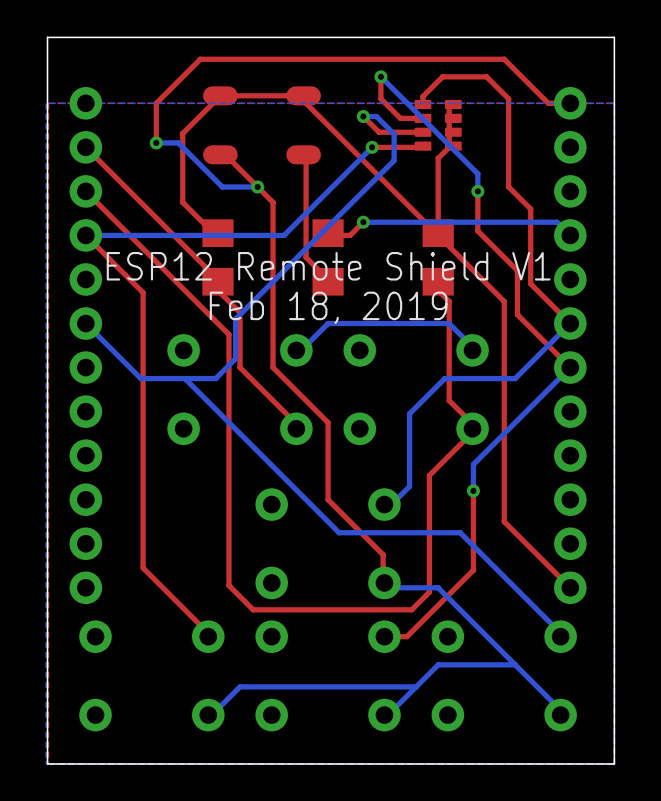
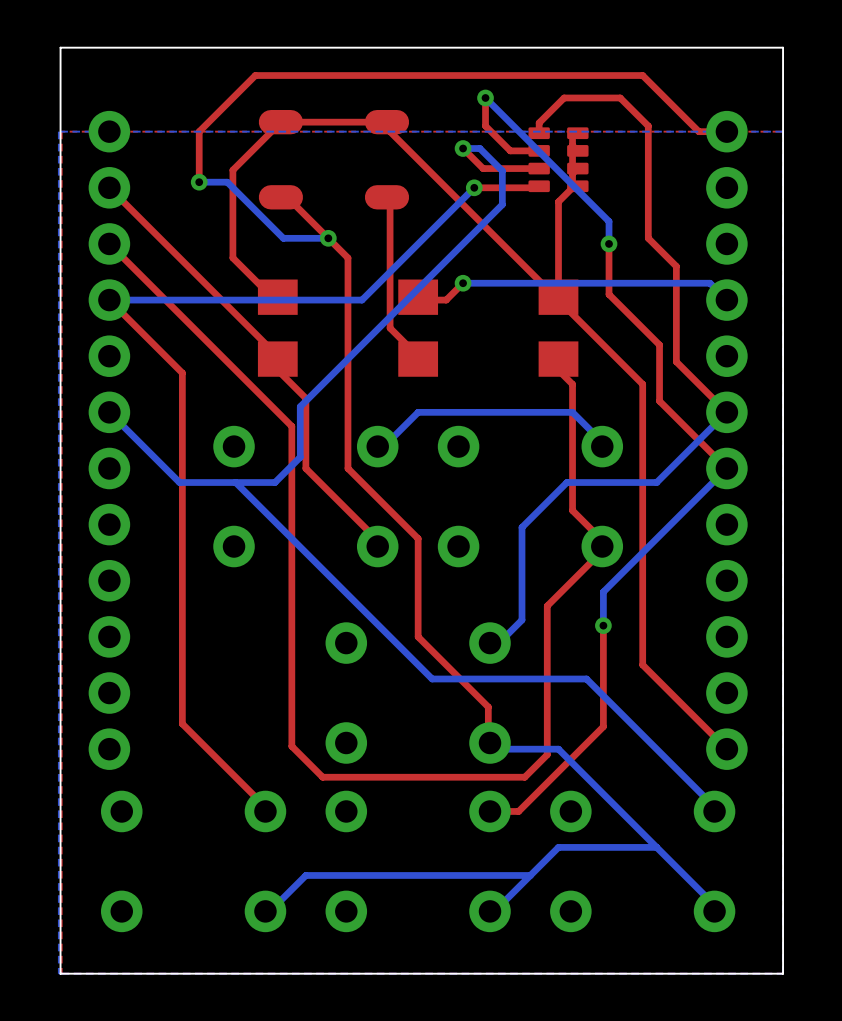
text: ESP12 Remote Shield V1 (328, 266) -> none
text: Feb 18, 2019 (328, 307) -> none

